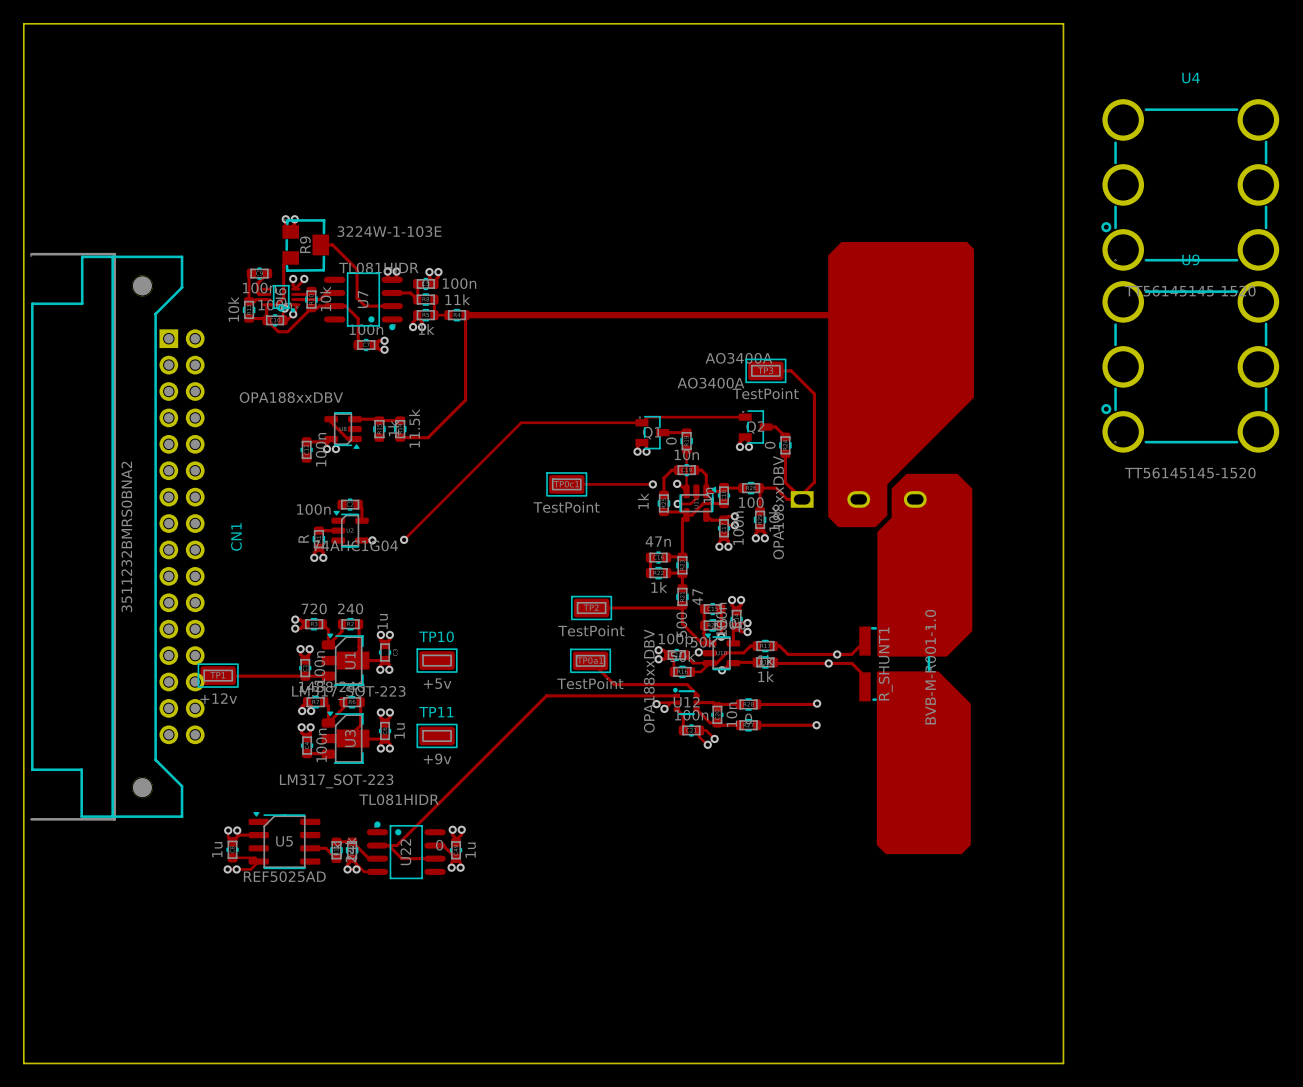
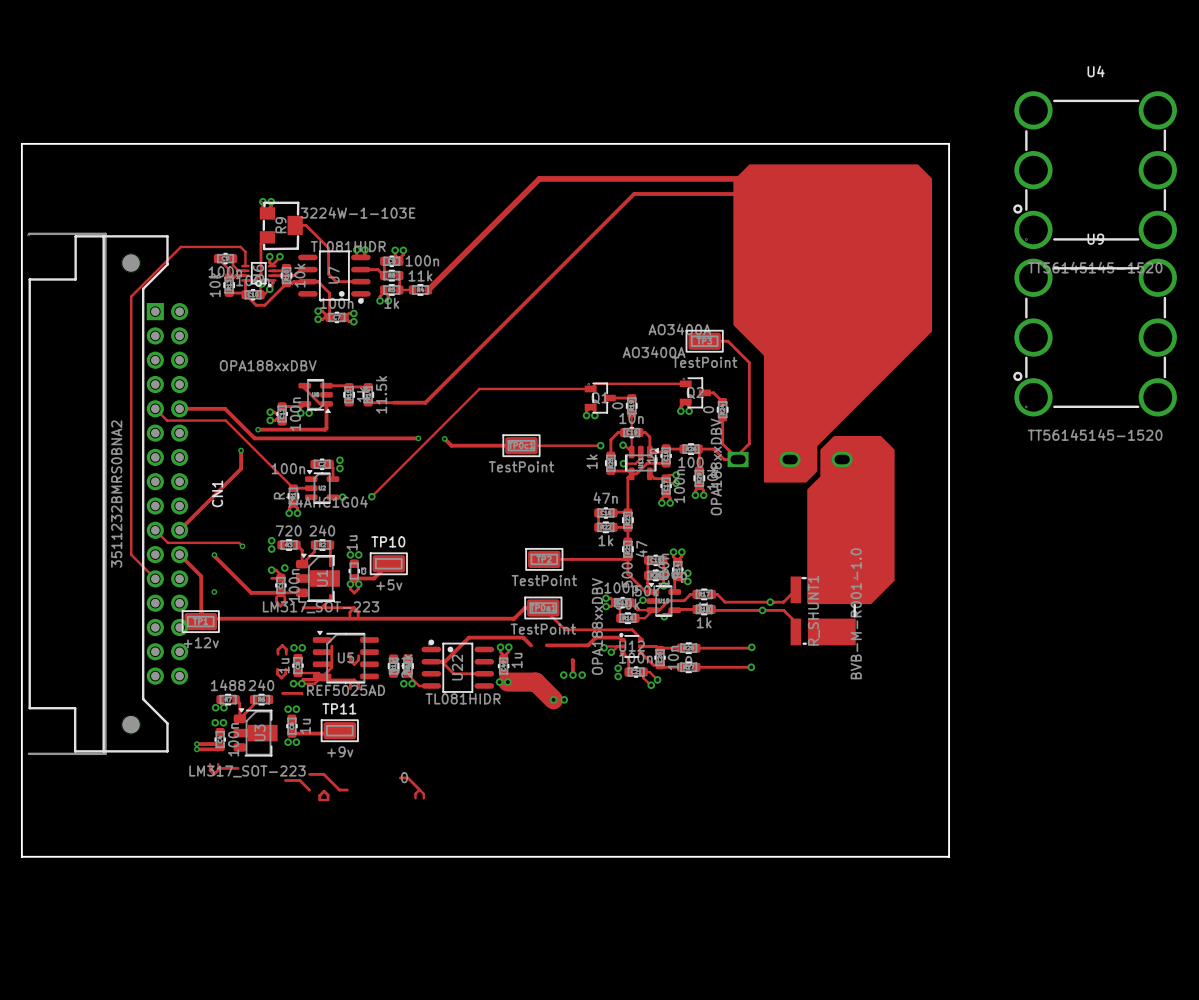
board edge: (23, 156) (23, 23) (1063, 23) (1063, 1063) (23, 1063) (23, 931) -> (21, 143) (949, 143) (949, 856) (21, 856)
drawing: none -> [733, 164, 933, 483]
drawing: [828, 242, 974, 528] -> none
track: (251, 273) (249, 275) (249, 293) -> (218, 258) (229, 269)
part position: (259, 273) -> (225, 258)
track: (267, 273) (257, 283) (257, 292) -> (232, 258) (232, 265) (237, 269)
track: none -> (245, 266) (245, 251) (240, 246) (180, 246) (131, 296) (131, 554) (155, 578)
track: none -> (318, 311) (322, 311) (326, 315) (322, 319) (318, 319)
via: none -> (318, 311)
via: none -> (318, 319)
track: (901, 384) (831, 315) (465, 315) (465, 400) (428, 437) -> (428, 289) (539, 178) (750, 178) (832, 261) (832, 323) (832, 291) (734, 193) (634, 193) (425, 402) (393, 402)
track: none -> (326, 403) (325, 429) (258, 429)
track: none -> (155, 408) (167, 420) (225, 420) (293, 488)
track: none -> (179, 408) (225, 408) (254, 438) (418, 438)
track: none -> (270, 412) (274, 412) (278, 416) (275, 420) (270, 420)
via: none -> (270, 412)
via: none -> (270, 420)
via: none -> (258, 429)
via: none -> (418, 438)
track: none -> (444, 438) (451, 445) (521, 445)
via: none -> (444, 438)
track: none -> (241, 450) (241, 468) (179, 530)
via: none -> (241, 450)
via: none -> (339, 460)
via: none -> (339, 468)
track: none -> (155, 530) (167, 542) (239, 542) (242, 546)
via: none -> (271, 540)
via: none -> (242, 546)
via: none -> (271, 549)
track: none -> (179, 554) (201, 576) (201, 612) (207, 618) (513, 619) (524, 607) (543, 607)
track: none -> (214, 555) (251, 592) (302, 592)
via: none -> (214, 555)
via: none -> (350, 554)
via: none -> (358, 554)
track: none -> (388, 563) (374, 578) (354, 578)
via: none -> (284, 567)
part position: (314, 624) -> (289, 545)
track: (322, 624) (328, 629) (328, 644) (341, 631) (341, 624) -> (296, 545) (302, 550) (302, 564) (314, 551) (314, 545)
part position: (350, 624) -> (322, 545)
track: (359, 624) (359, 646) -> (330, 545) (330, 565)
via: (295, 628) -> none
via: none -> (214, 591)
via: (300, 649) -> none
via: (309, 649) -> none
part position: (385, 652) -> (354, 571)
U1 position: (345, 659) -> (317, 577)
TP10 position: (437, 660) -> (388, 563)
part position: (305, 668) -> (280, 585)
via: (380, 669) -> none
via: (389, 669) -> none
drawing: [876, 671, 971, 855] -> none
track: (218, 675) (328, 676) -> none
track: (676, 695) (546, 695) (396, 845) (377, 845) -> (622, 640) (620, 637) (595, 637) (588, 645) (546, 645)
track: none -> (531, 645) (523, 637) (468, 637) (444, 661) (431, 661) (441, 661) (453, 673) (484, 673)
part position: (315, 702) -> (228, 699)
track: (324, 702) (328, 706) (328, 722) (343, 707) (343, 702) -> (236, 699) (239, 703) (239, 718) (253, 704) (253, 699)
part position: (352, 702) -> (261, 699)
via: none -> (500, 647)
via: none -> (508, 647)
via: none -> (294, 647)
via: none -> (302, 647)
via: (302, 711) -> none
via: (311, 711) -> none
via: (380, 712) -> none
via: (389, 712) -> none
track: none -> (572, 660) (572, 675)
via: none -> (618, 668)
via: (301, 727) -> none
via: (310, 727) -> none
part position: (385, 731) -> (291, 726)
track: none -> (503, 673) (507, 677) (507, 682) (535, 682) (553, 699) (556, 696)
via: none -> (563, 675)
via: none -> (572, 675)
via: none -> (582, 675)
TP11 position: (437, 735) -> (339, 730)
via: none -> (618, 676)
U3 position: (345, 737) -> (255, 732)
via: none -> (499, 682)
via: none -> (507, 682)
via: none -> (293, 683)
via: none -> (301, 683)
via: none -> (403, 683)
via: none -> (412, 683)
part position: (307, 745) -> (220, 739)
via: (380, 748) -> none
via: (389, 748) -> none
via: none -> (553, 699)
via: none -> (564, 699)
via: none -> (215, 707)
via: none -> (223, 707)
via: none -> (288, 709)
via: none -> (296, 709)
via: none -> (215, 722)
via: none -> (223, 722)
track: none -> (339, 730) (336, 733) (291, 733)
U22 value position: TL081HIDR (399, 799) -> TL081HIDR (463, 698)
via: none -> (288, 742)
via: none -> (296, 742)
track: none -> (196, 744) (217, 744) (220, 746) (217, 749) (196, 749)
via: none -> (196, 744)
via: none -> (196, 749)
track: (452, 829) (452, 835) (456, 839) (461, 834) (461, 829) -> (500, 647) (500, 652) (504, 656) (508, 651) (508, 647)
via: (452, 829) -> none
via: (461, 829) -> none
via: (228, 830) -> none
via: (237, 830) -> none
U5 position: (284, 840) -> (345, 657)
track: (388, 845) (401, 858) (435, 858) -> none
part position: (232, 849) -> (297, 665)
part position: (336, 850) -> (393, 666)
part position: (352, 850) -> (407, 666)
U22 position: (406, 850) -> (457, 666)
part position: (456, 850) -> (503, 666)
part value position: 1u (470, 850) -> 1u (516, 660)
track: (232, 857) (255, 857) (258, 861) (250, 869) (227, 869) -> (297, 673) (318, 673) (322, 676) (314, 683) (293, 683)
track: (356, 864) (364, 871) (377, 871) -> (412, 678) (419, 685) (431, 685)
via: (451, 867) -> none
via: (460, 867) -> none
via: (227, 869) -> none
via: (236, 869) -> none
via: (347, 869) -> none
via: (356, 869) -> none

